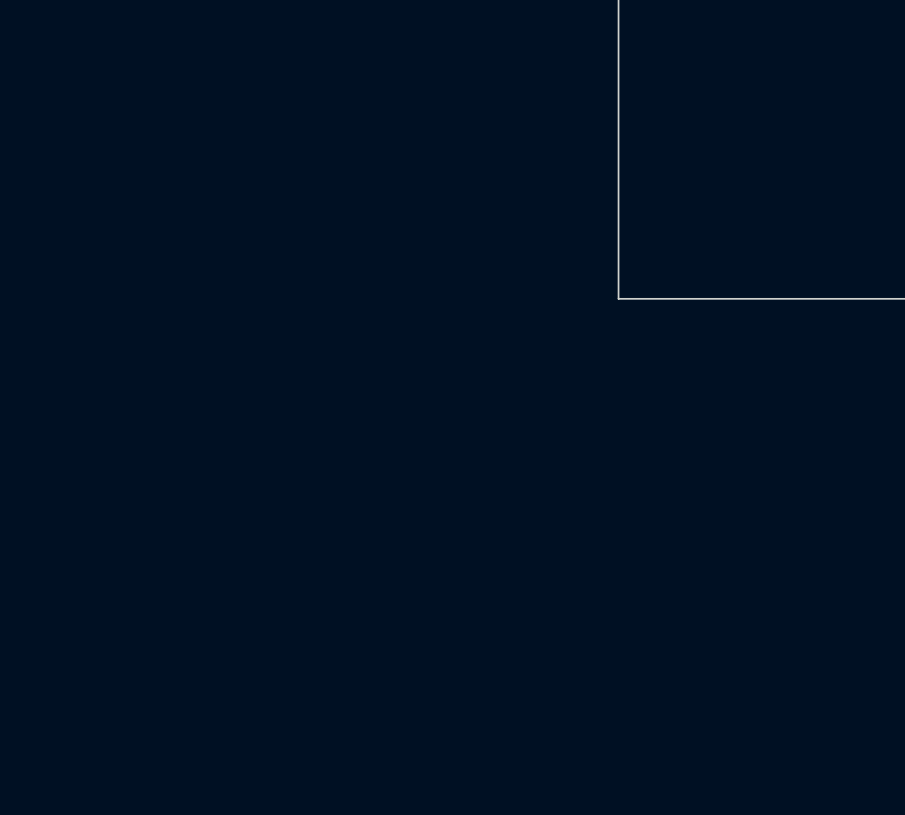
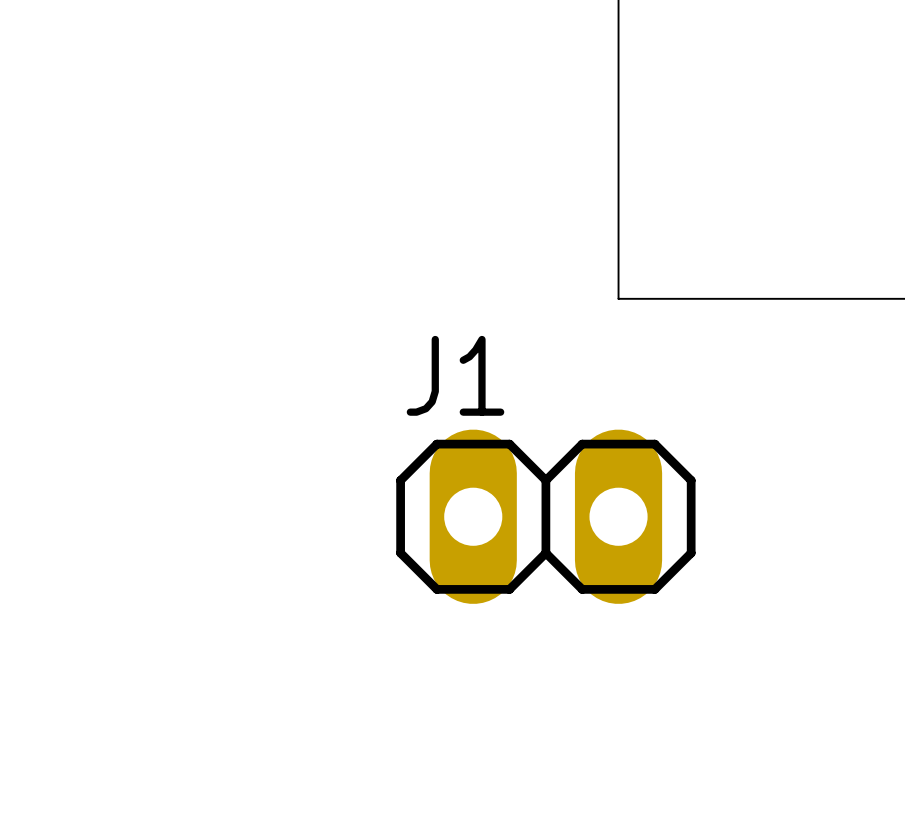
J1: none -> (545, 516)

